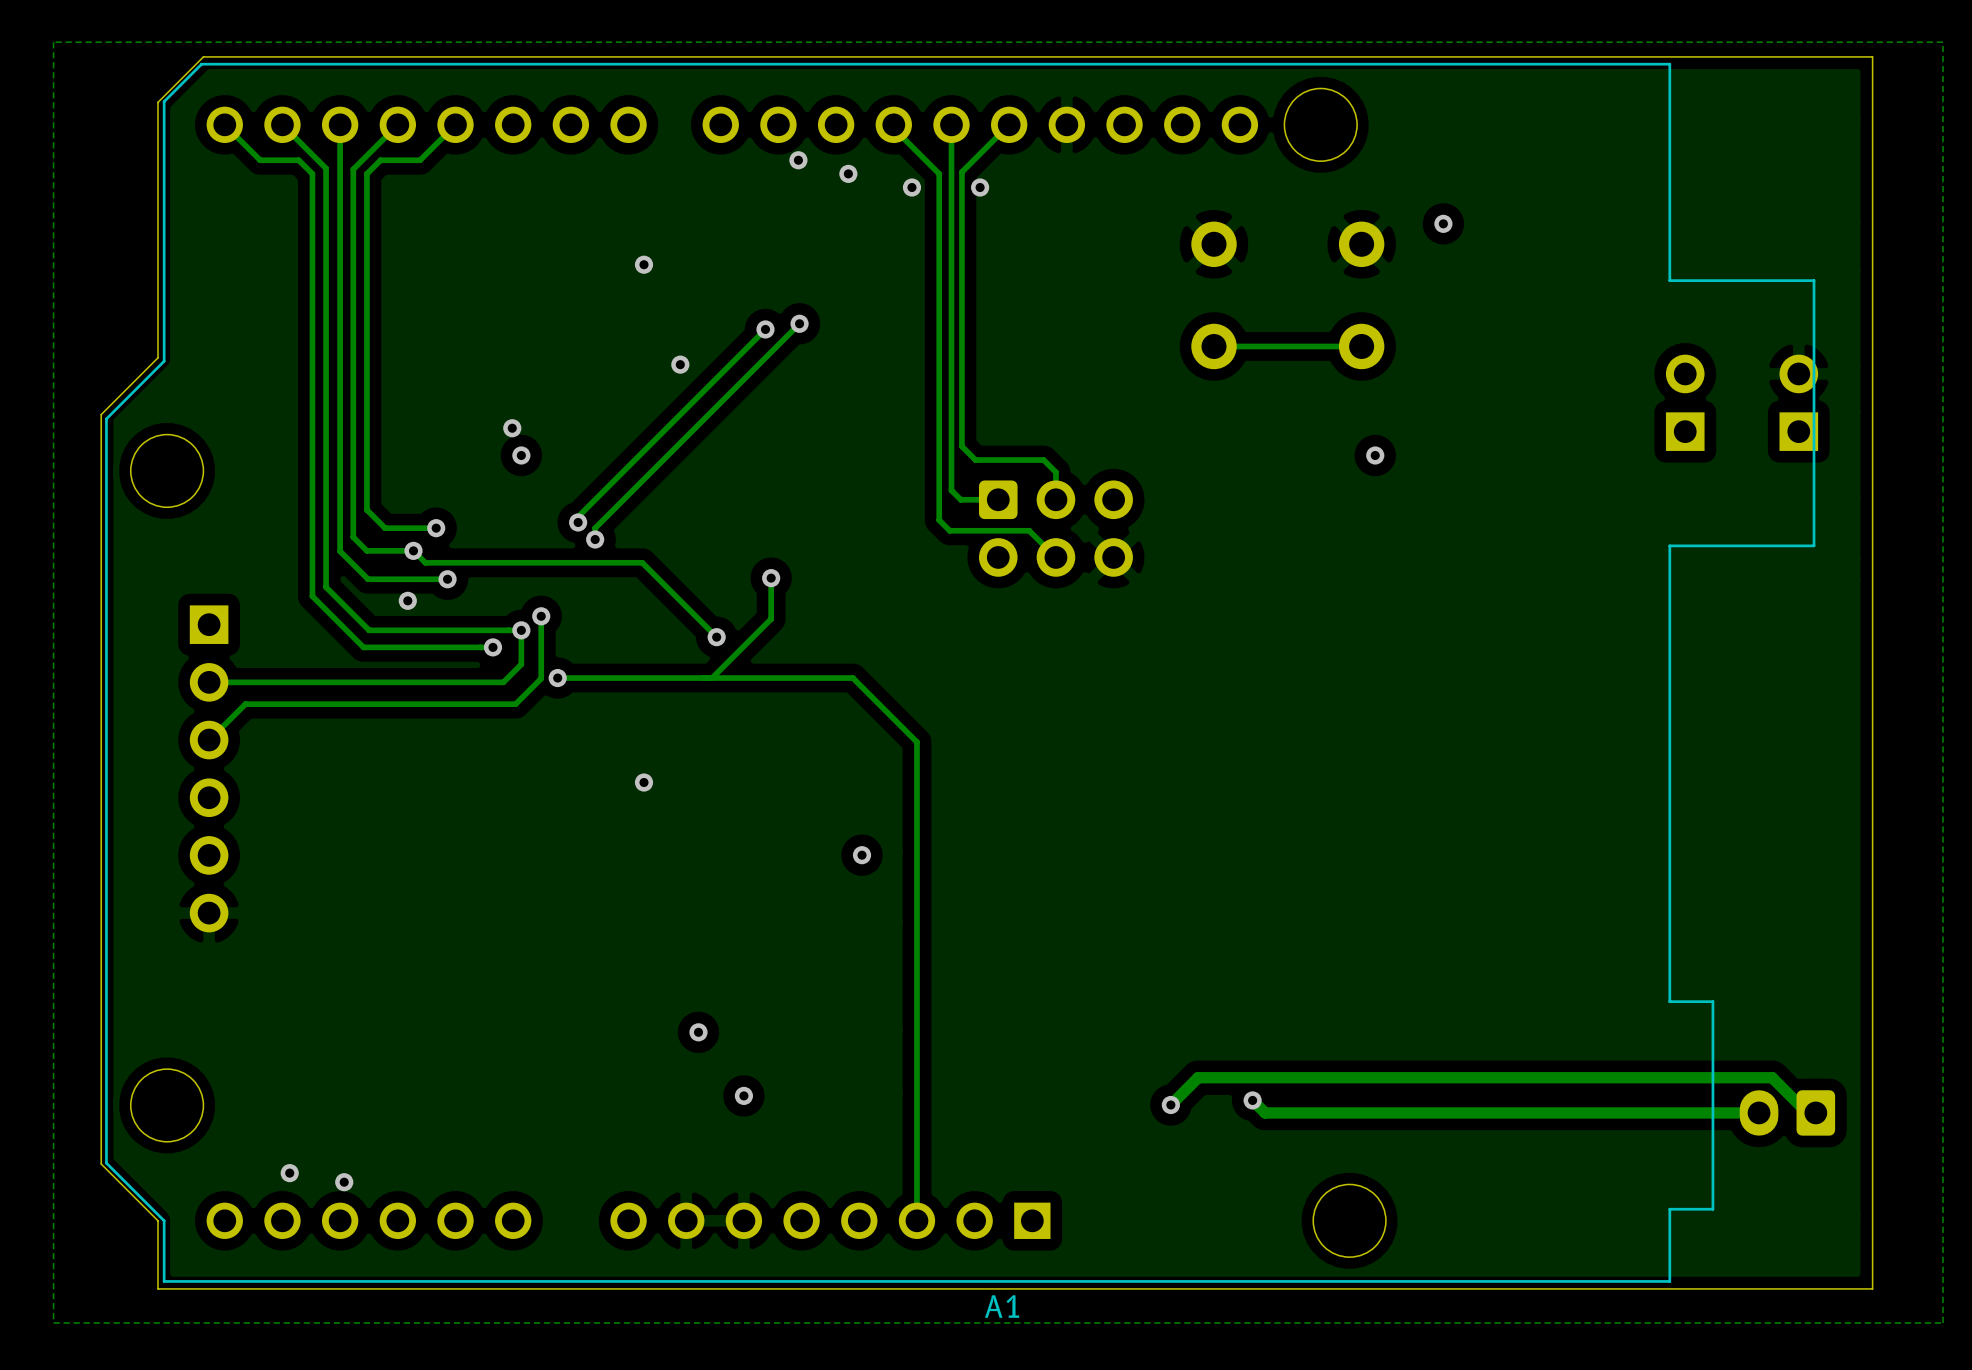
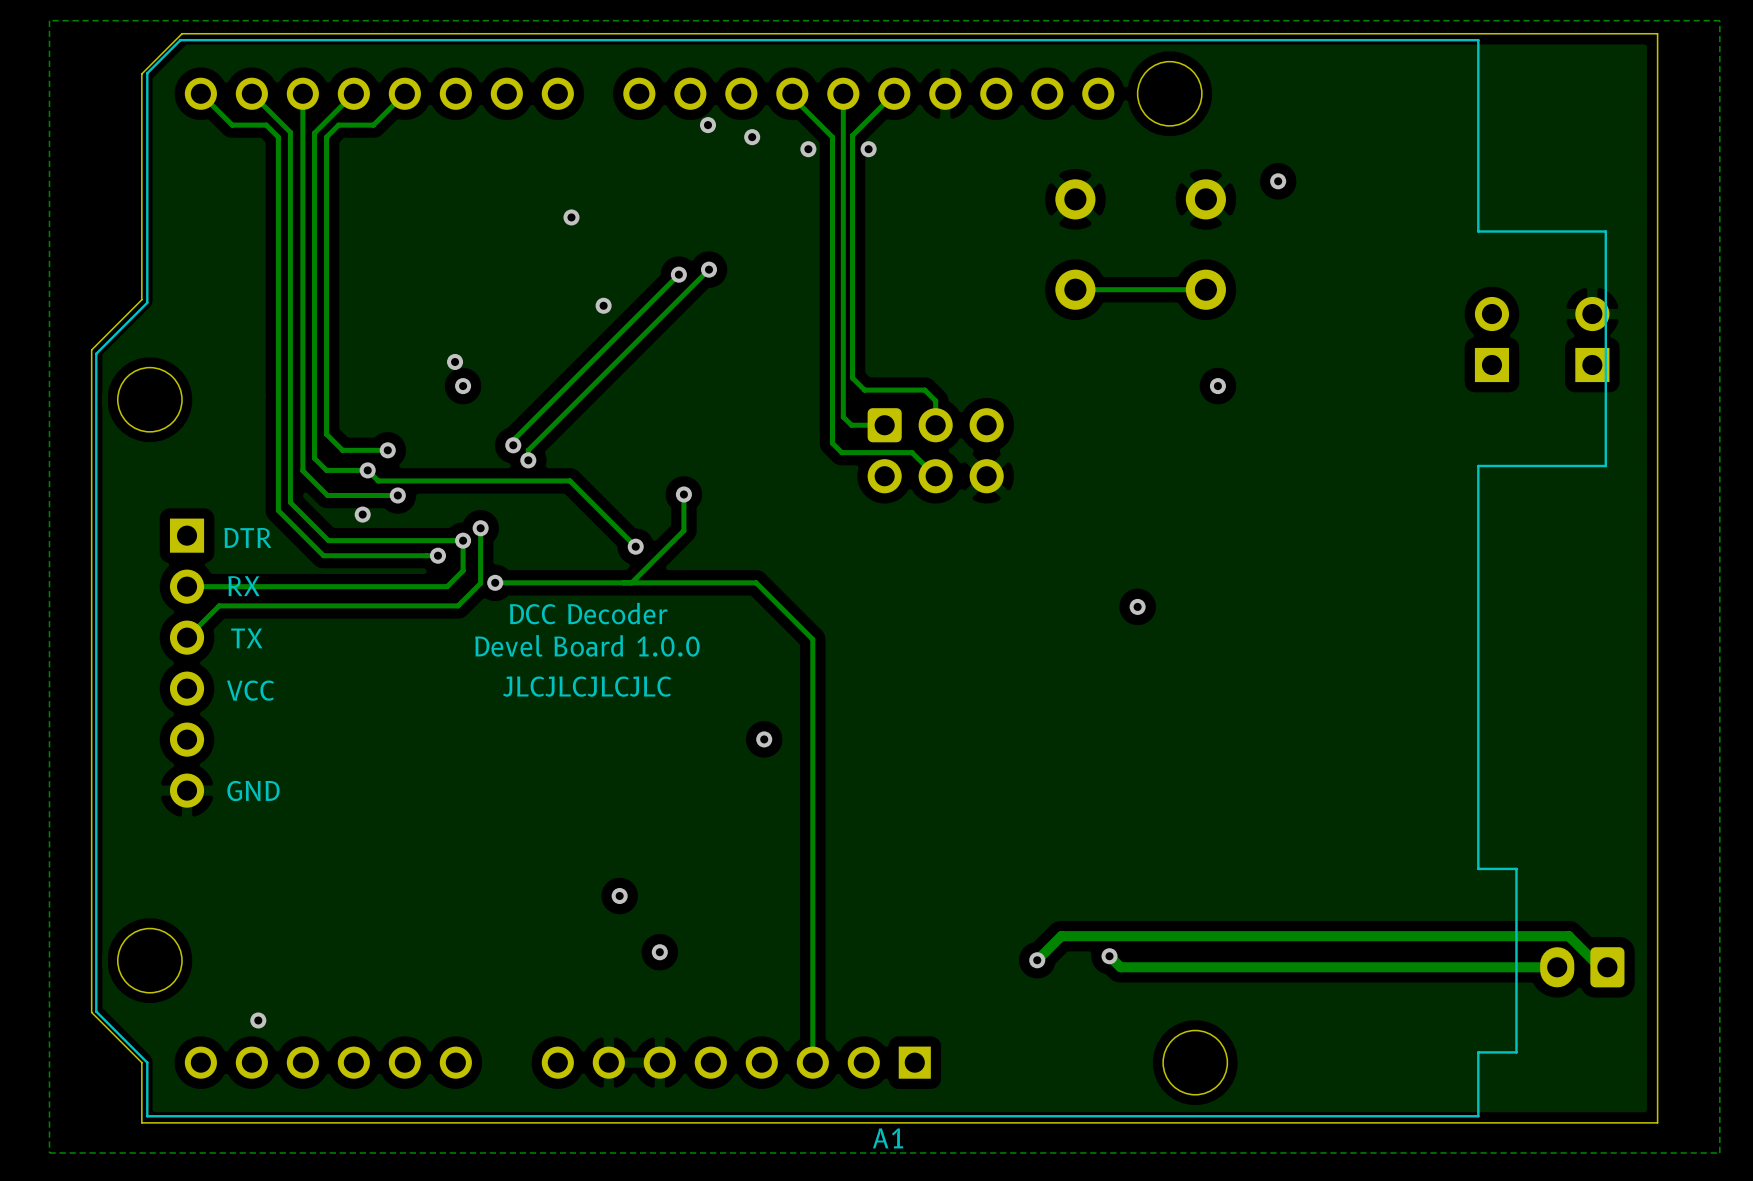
text: none -> DTR (247, 537)
text: none -> RX (243, 586)
via: none -> (1137, 606)
text: none -> DCC Decoder (588, 613)
text: none -> TX (246, 638)
text: none -> Devel Board 1.0.0 (587, 645)
via: (644, 782) -> none
text: none -> JLCJLCJLCJLC (587, 686)
text: none -> VCC (250, 690)
text: none -> GND (253, 790)
via: (344, 1182) -> none

